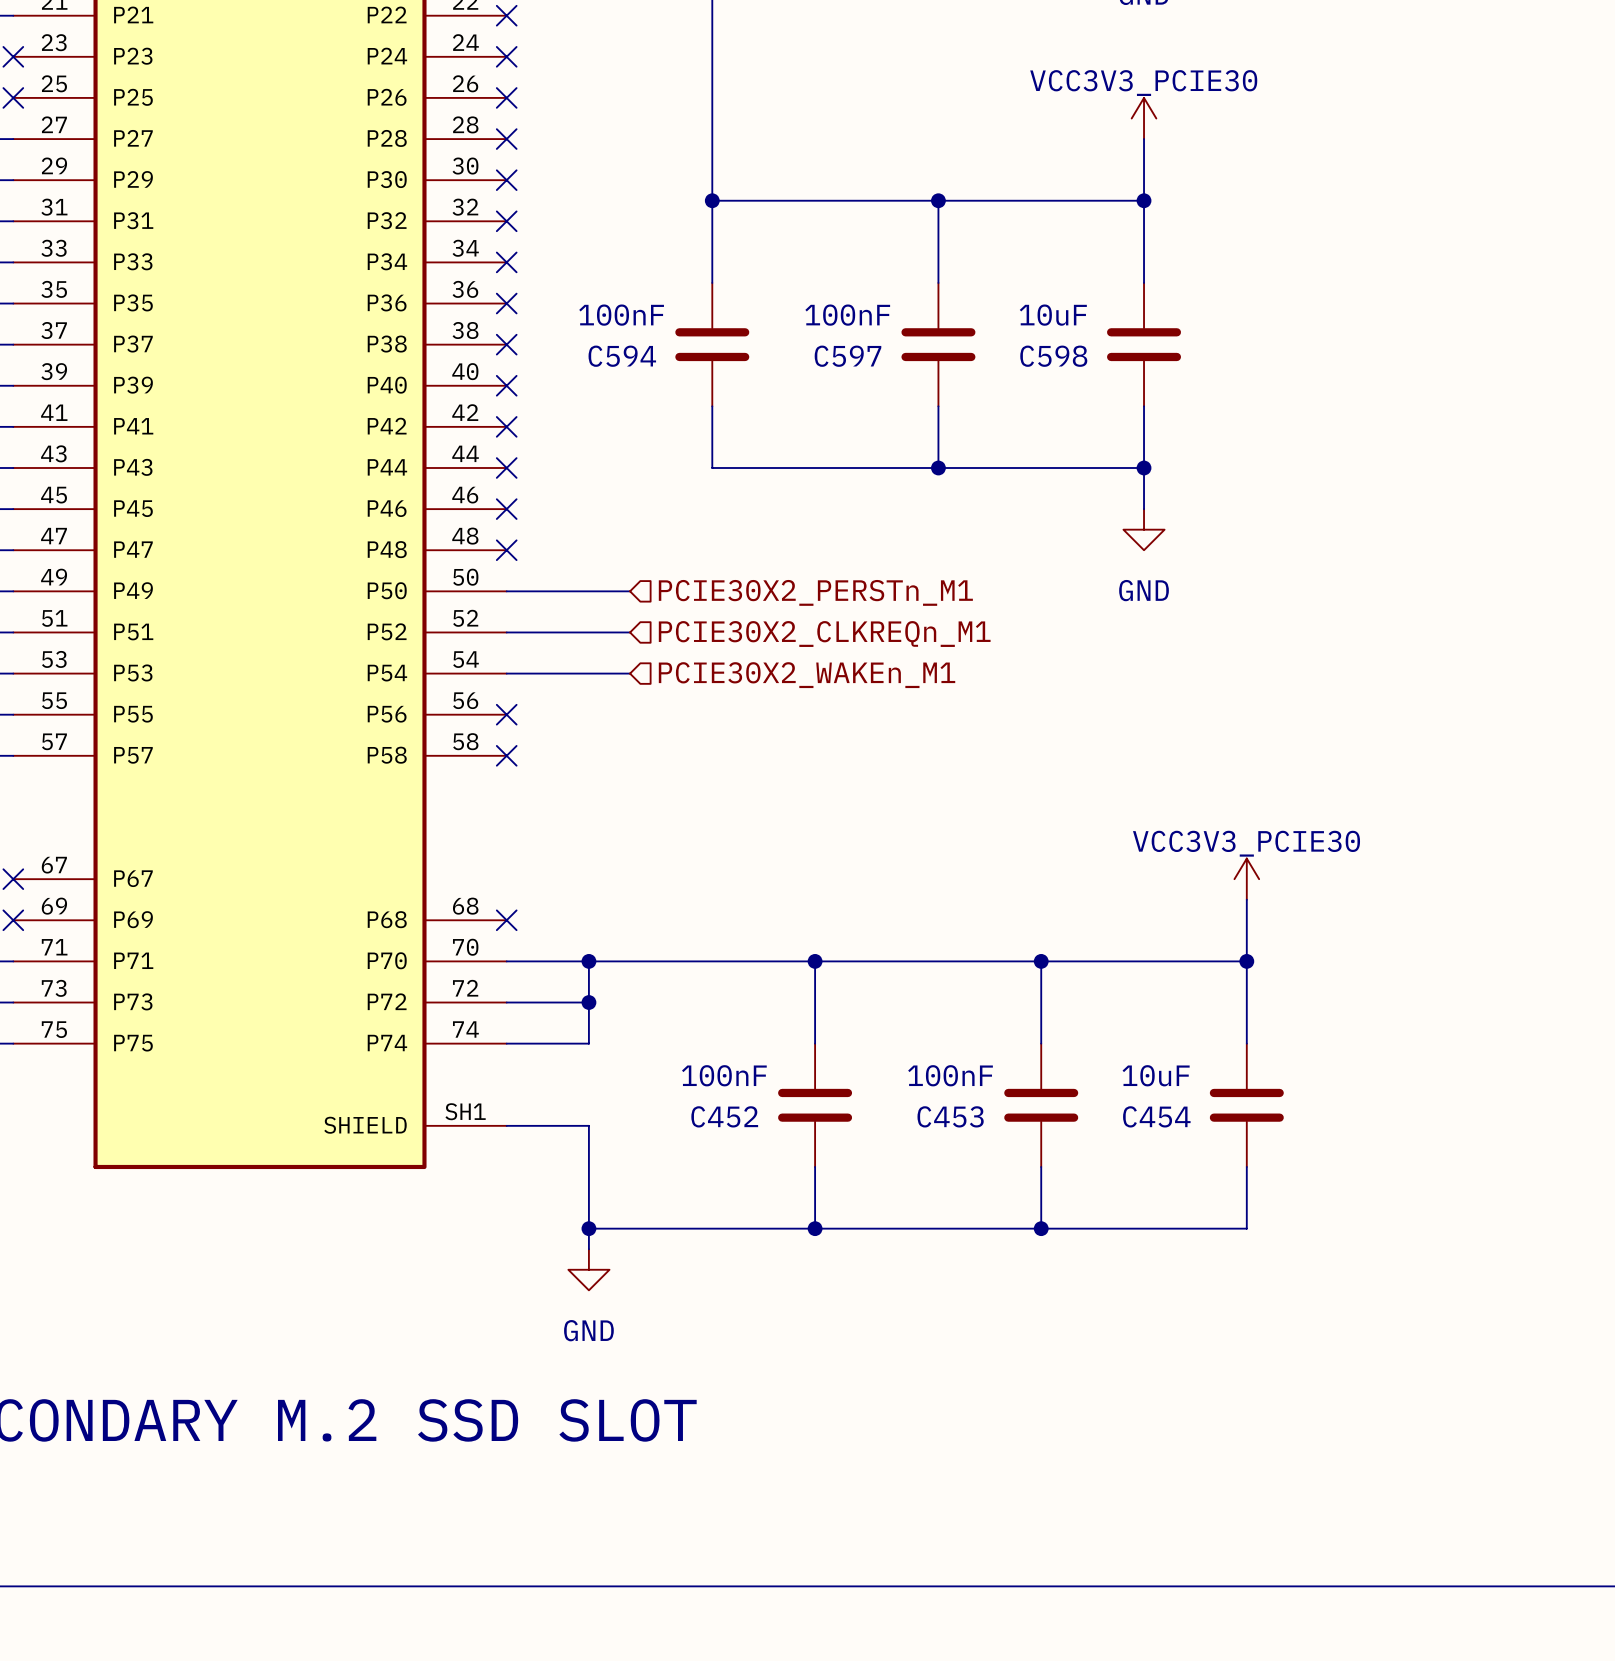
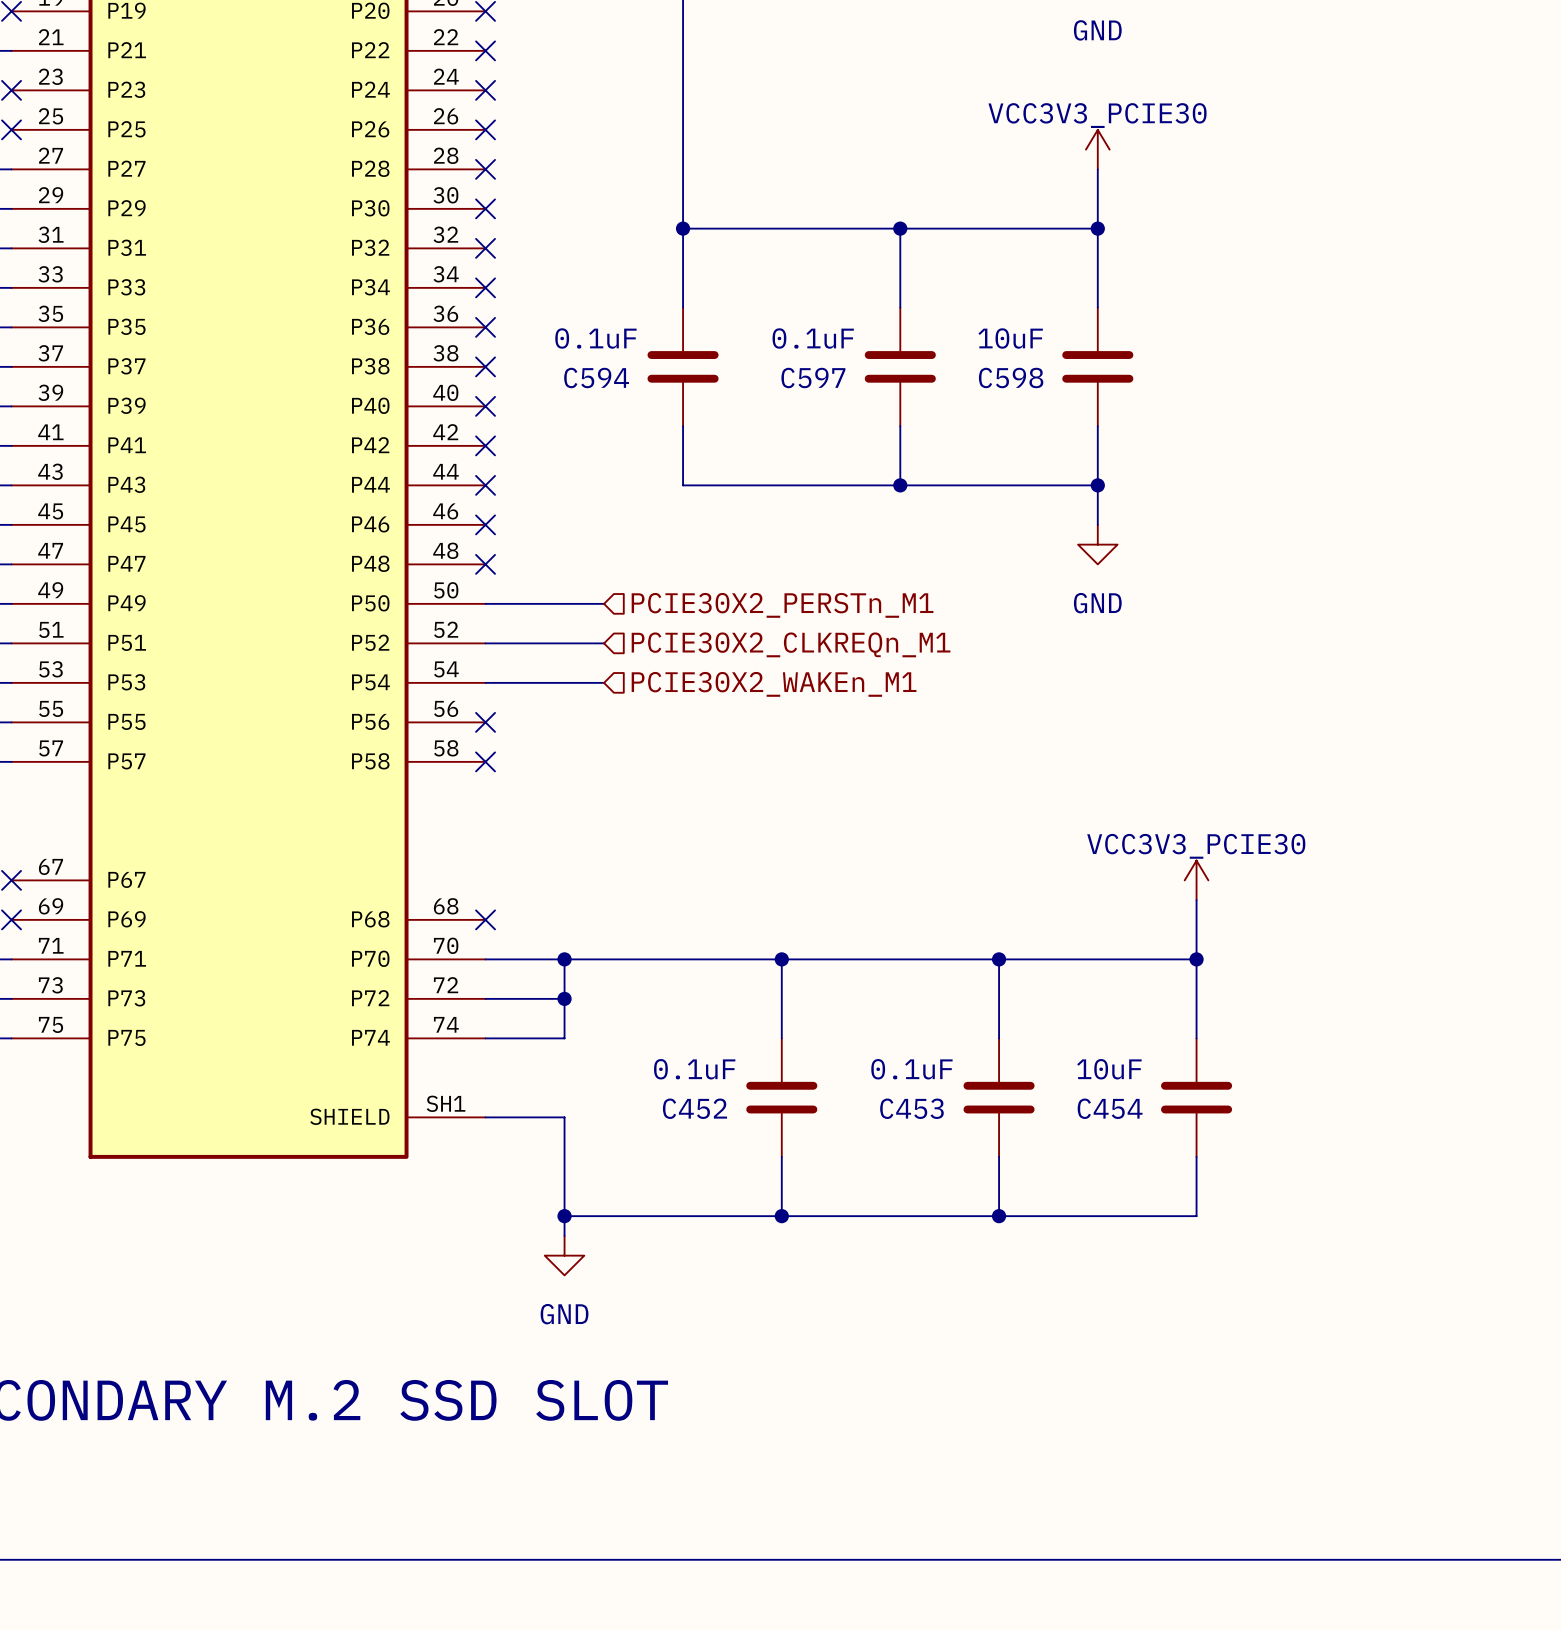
C594 value: 100nF (621, 315) -> 0.1uF (595, 338)
C597 value: 100nF (847, 315) -> 0.1uF (813, 338)
C452 value: 100nF (724, 1075) -> 0.1uF (694, 1069)
C453 value: 100nF (950, 1075) -> 0.1uF (911, 1069)

